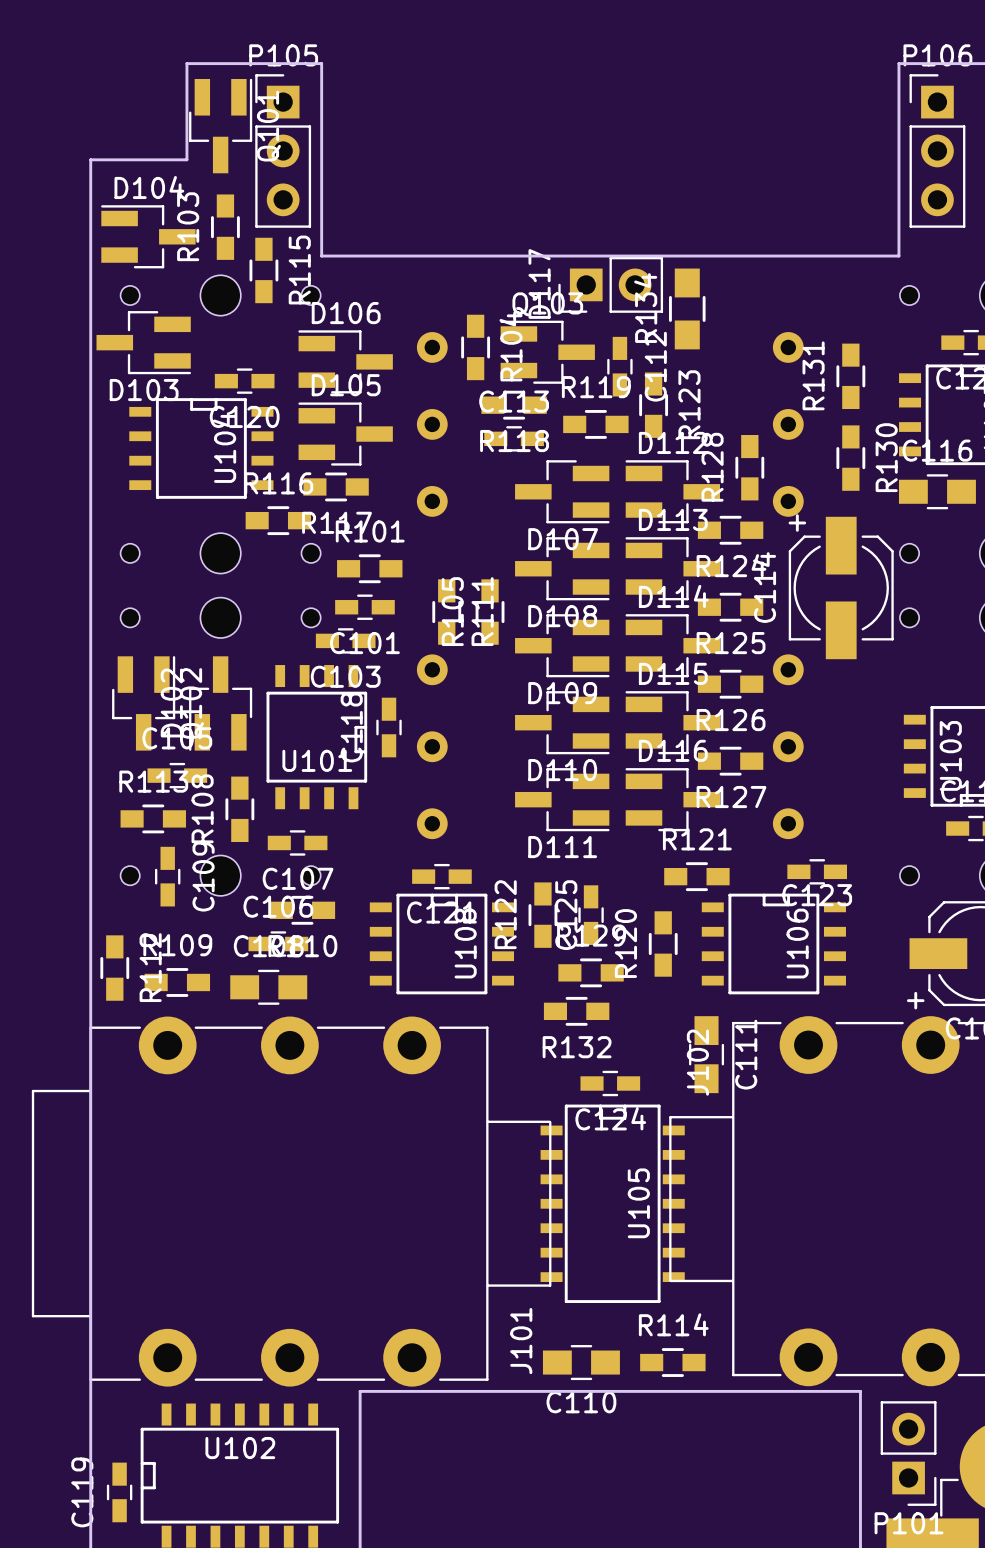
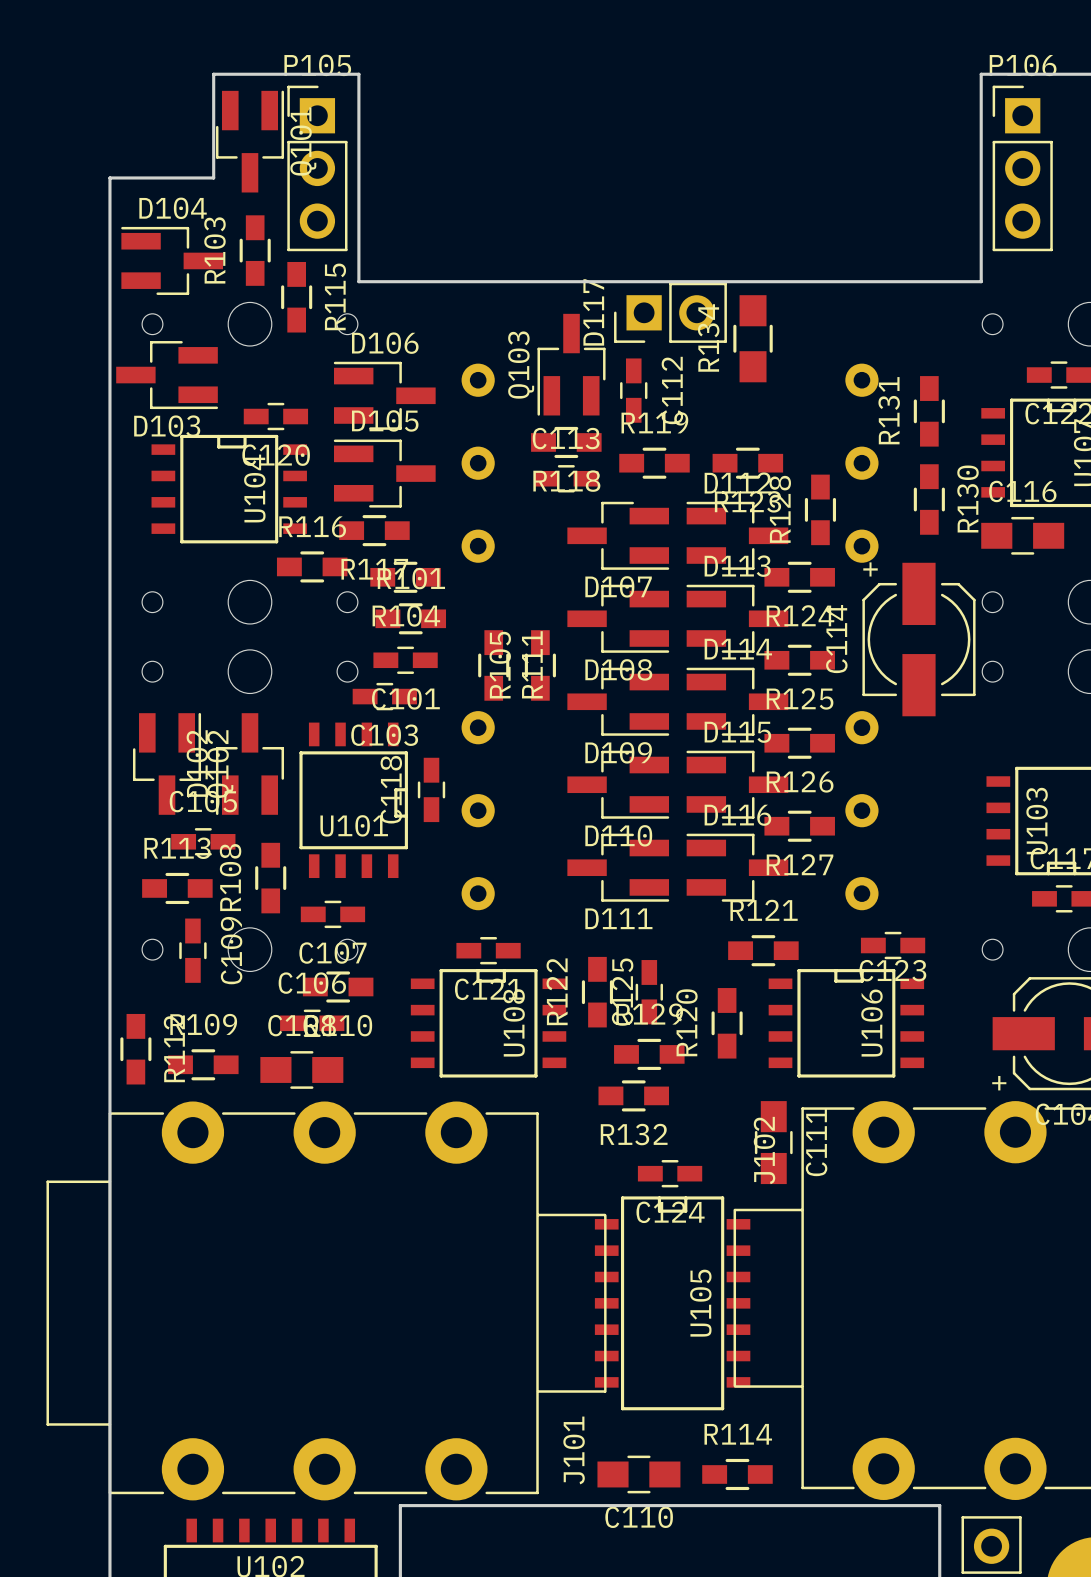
R104 rotation: 0° (475, 347) -> 90° clockwise (405, 577)
R104 position: (475, 347) -> (405, 577)
Q103 rotation: 0° (547, 352) -> 90° counterclockwise (571, 364)
C112 position: (619, 366) -> (633, 390)
R123 rotation: 0° (653, 405) -> 90° clockwise (747, 463)

